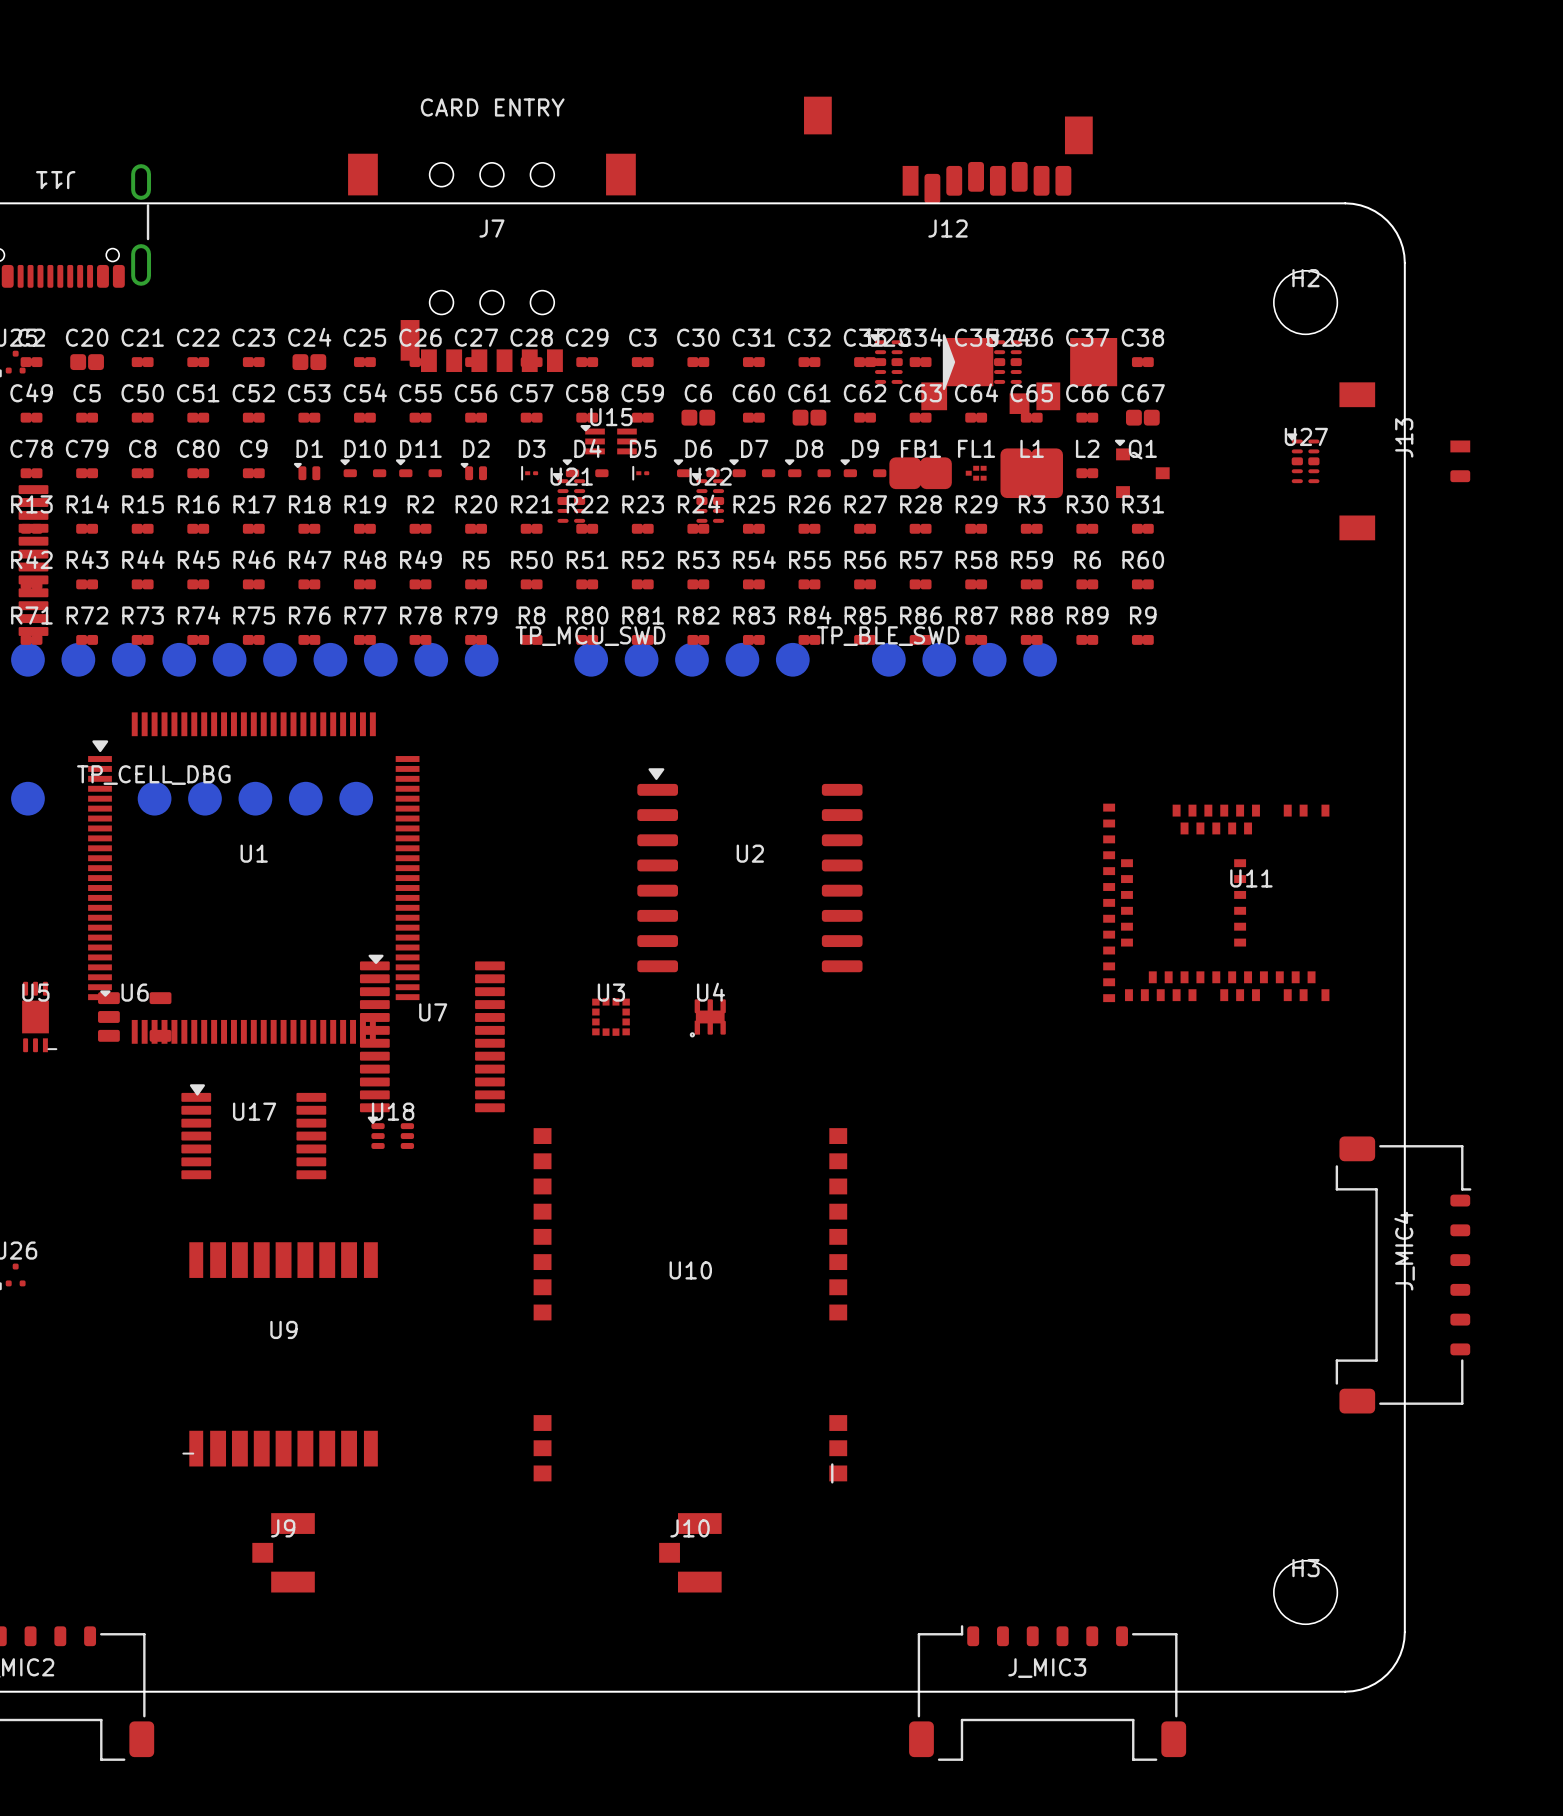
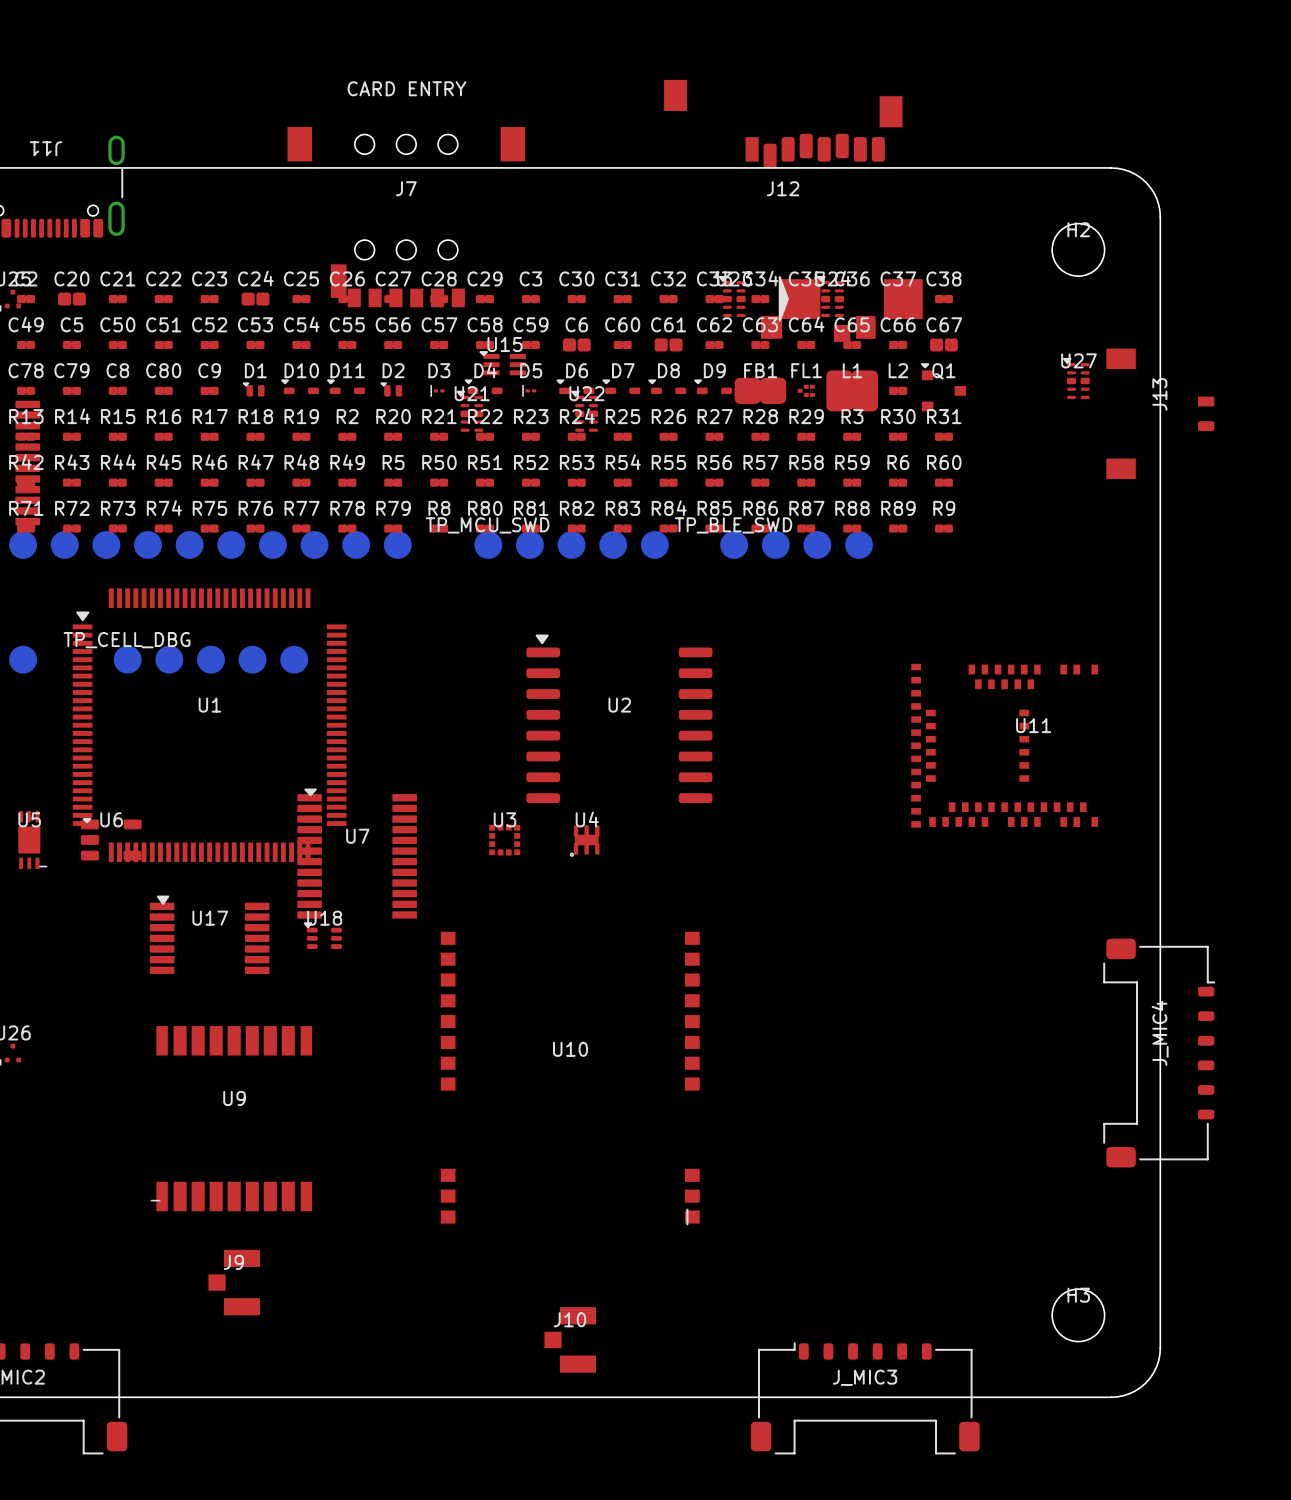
J13 position: (1404, 461) -> (1160, 413)
J10 position: (690, 1552) -> (570, 1339)

